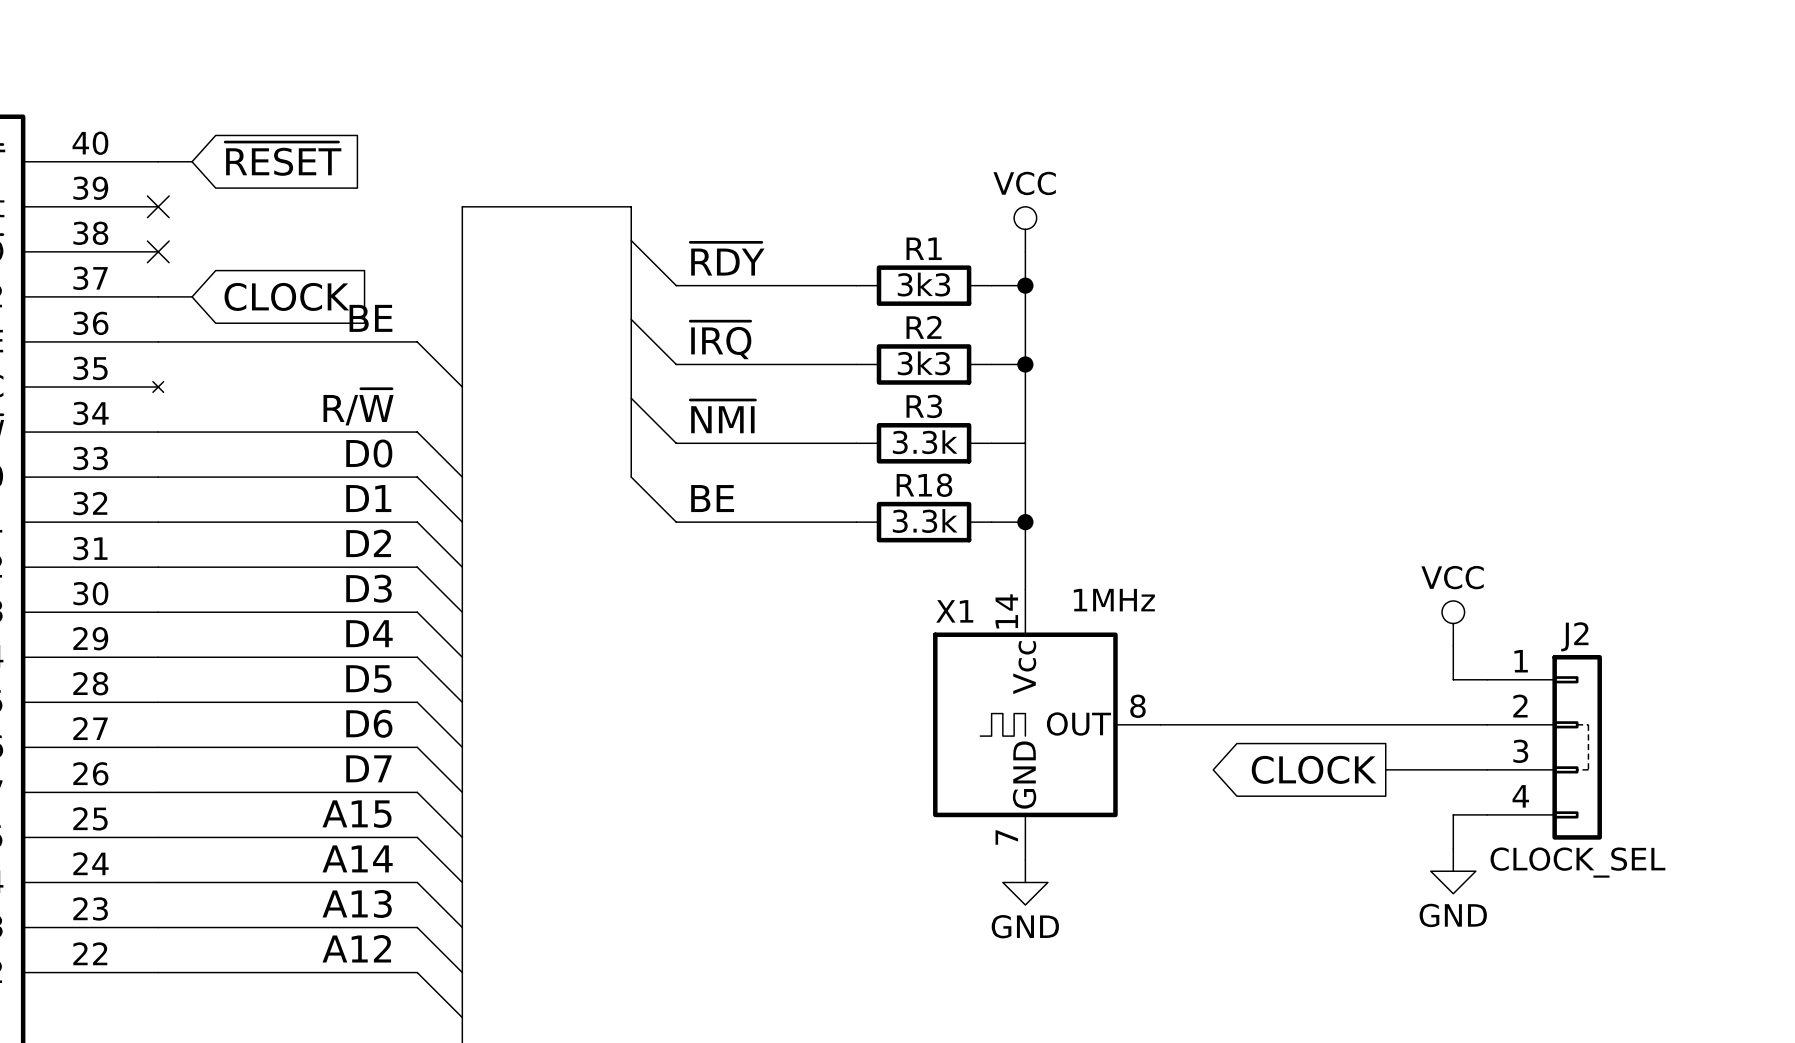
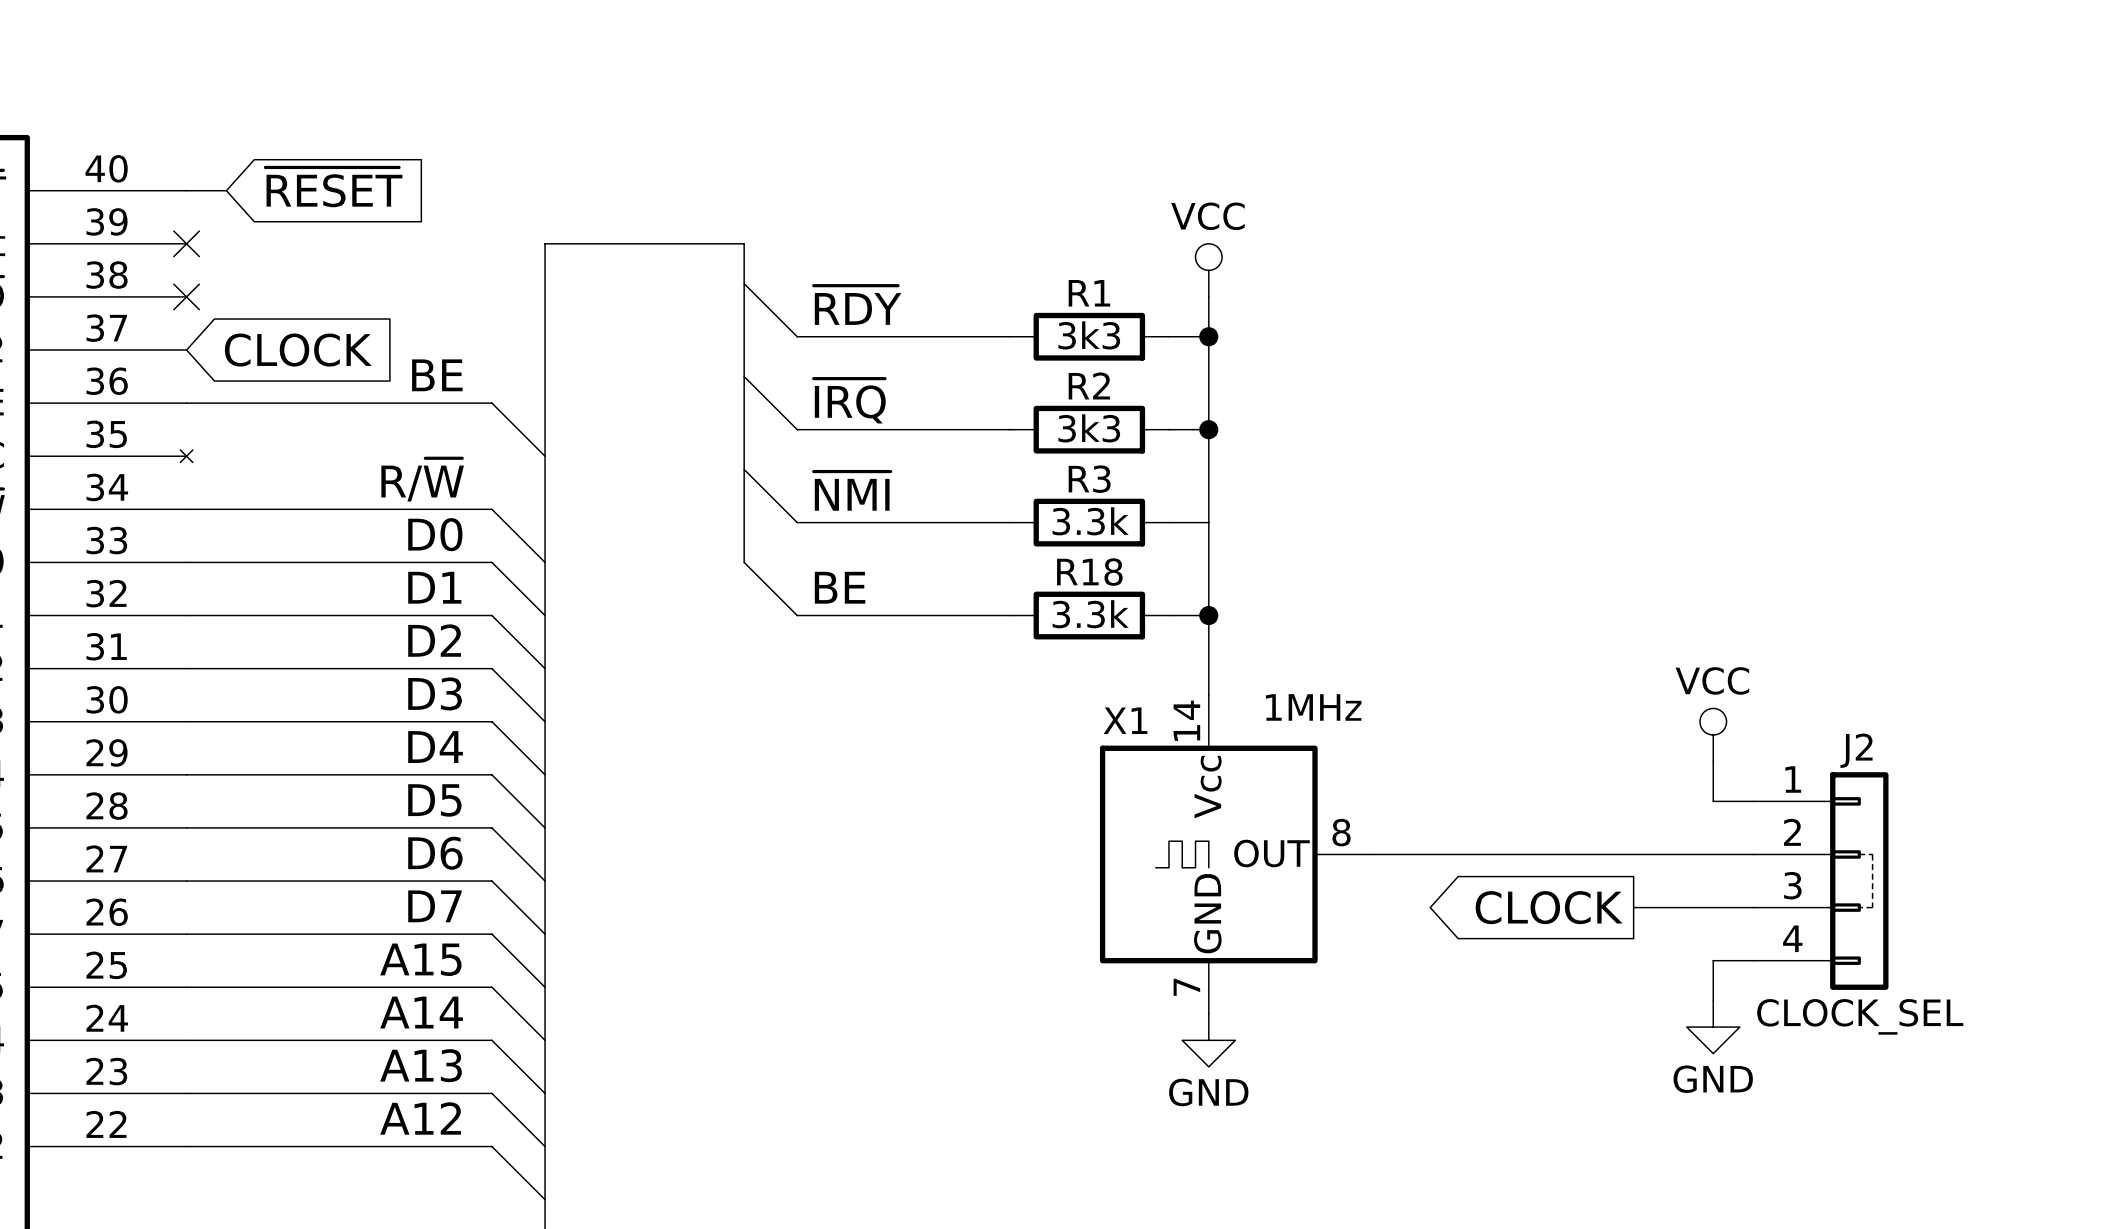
wire: (158, 296) (192, 296) -> none
global label position: CLOCK (286, 296) -> CLOCK (298, 350)

